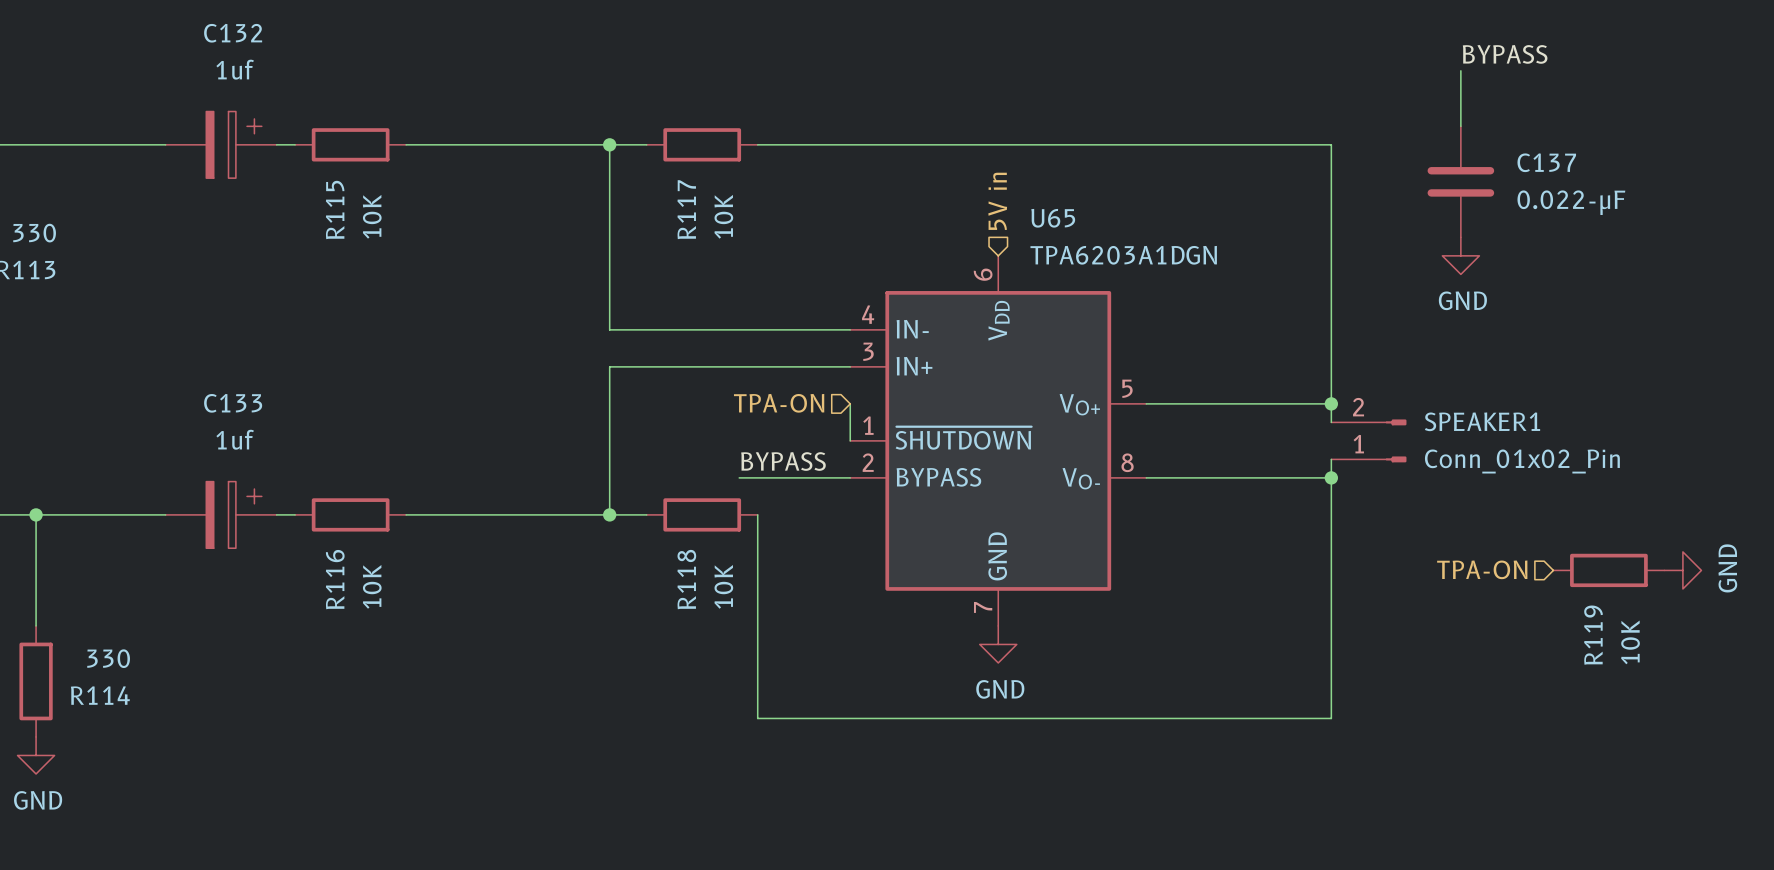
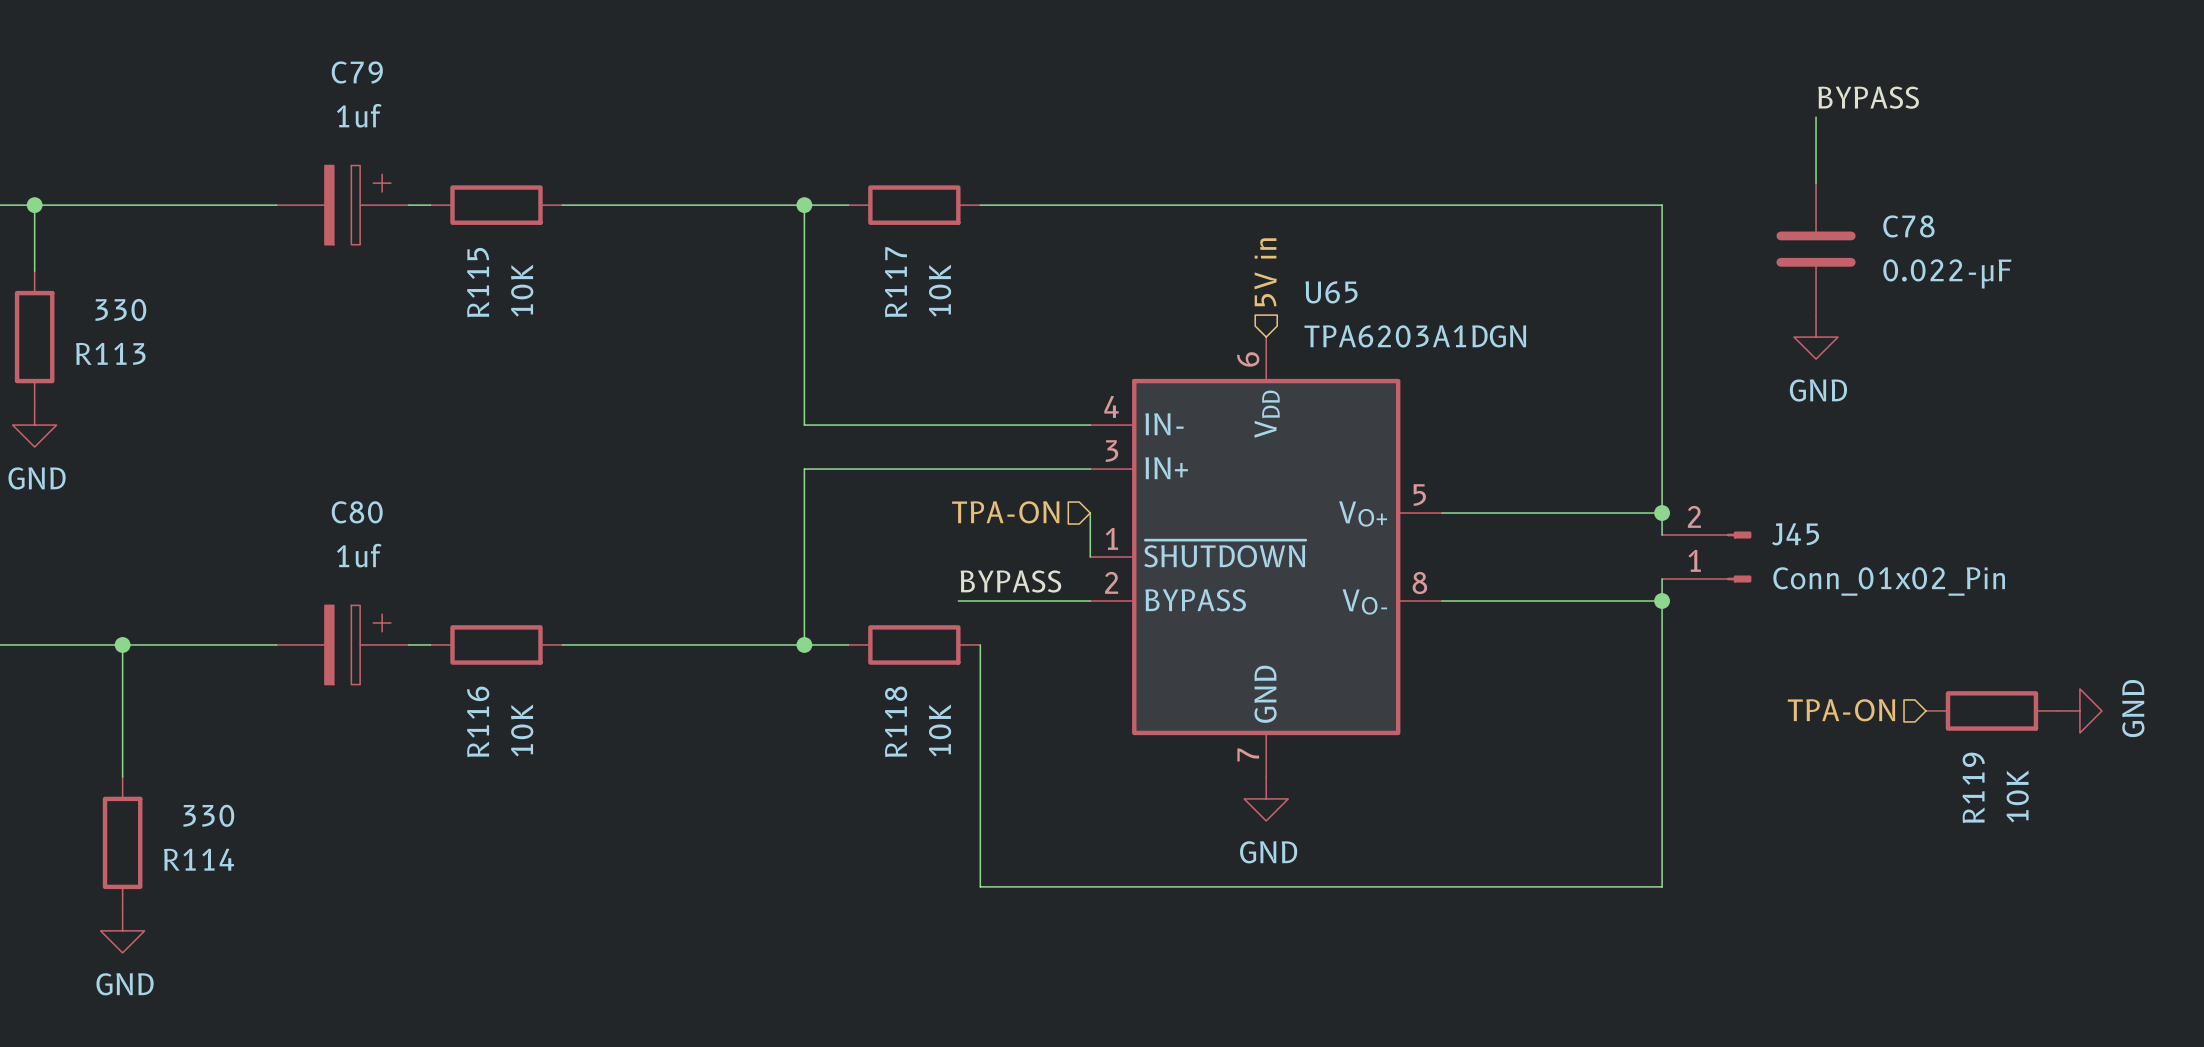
C132 name: C132 (233, 33) -> C79 (357, 72)
C137 name: C137 (1546, 162) -> C78 (1908, 226)
C133 name: C133 (233, 403) -> C80 (357, 512)
SPEAKER1 name: SPEAKER1 (1482, 421) -> J45 (1795, 534)

